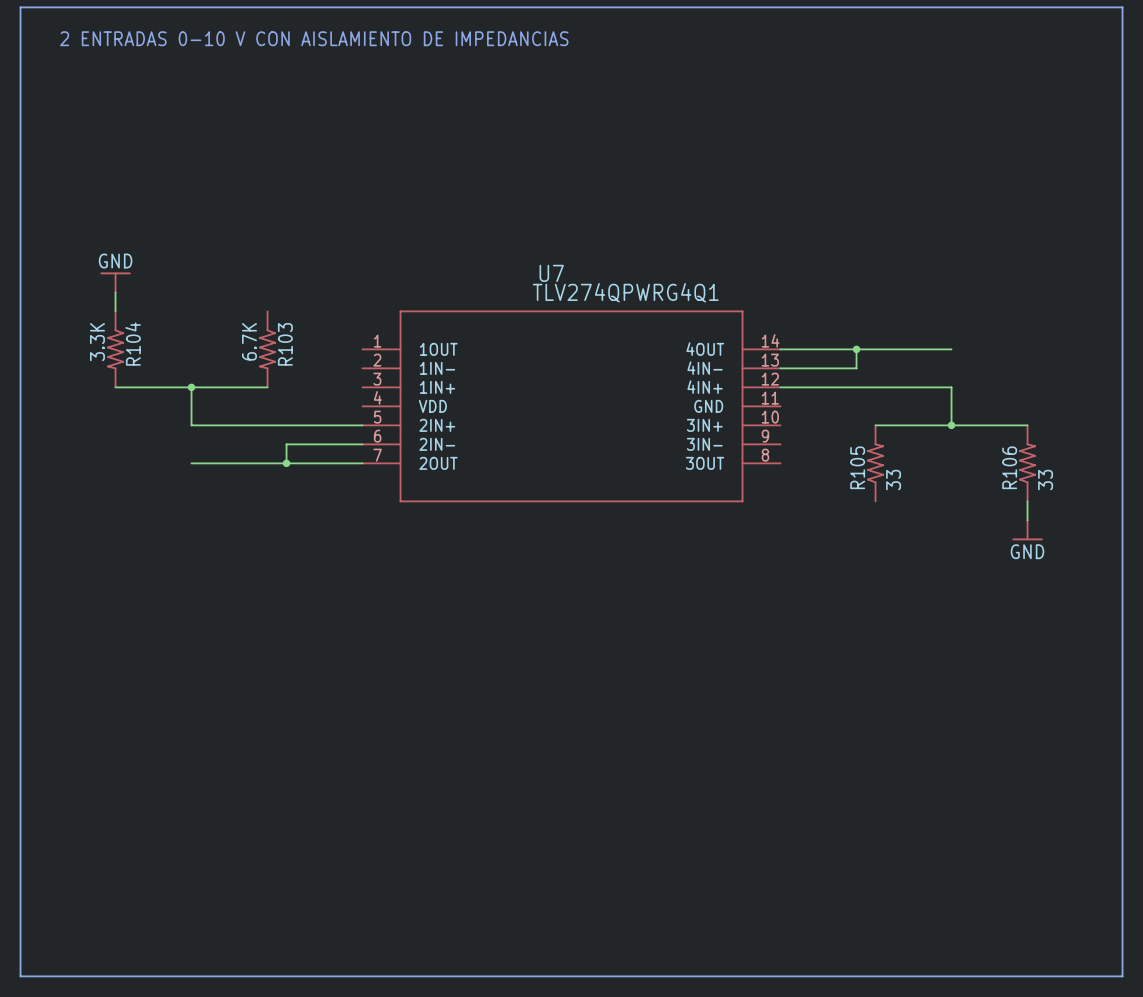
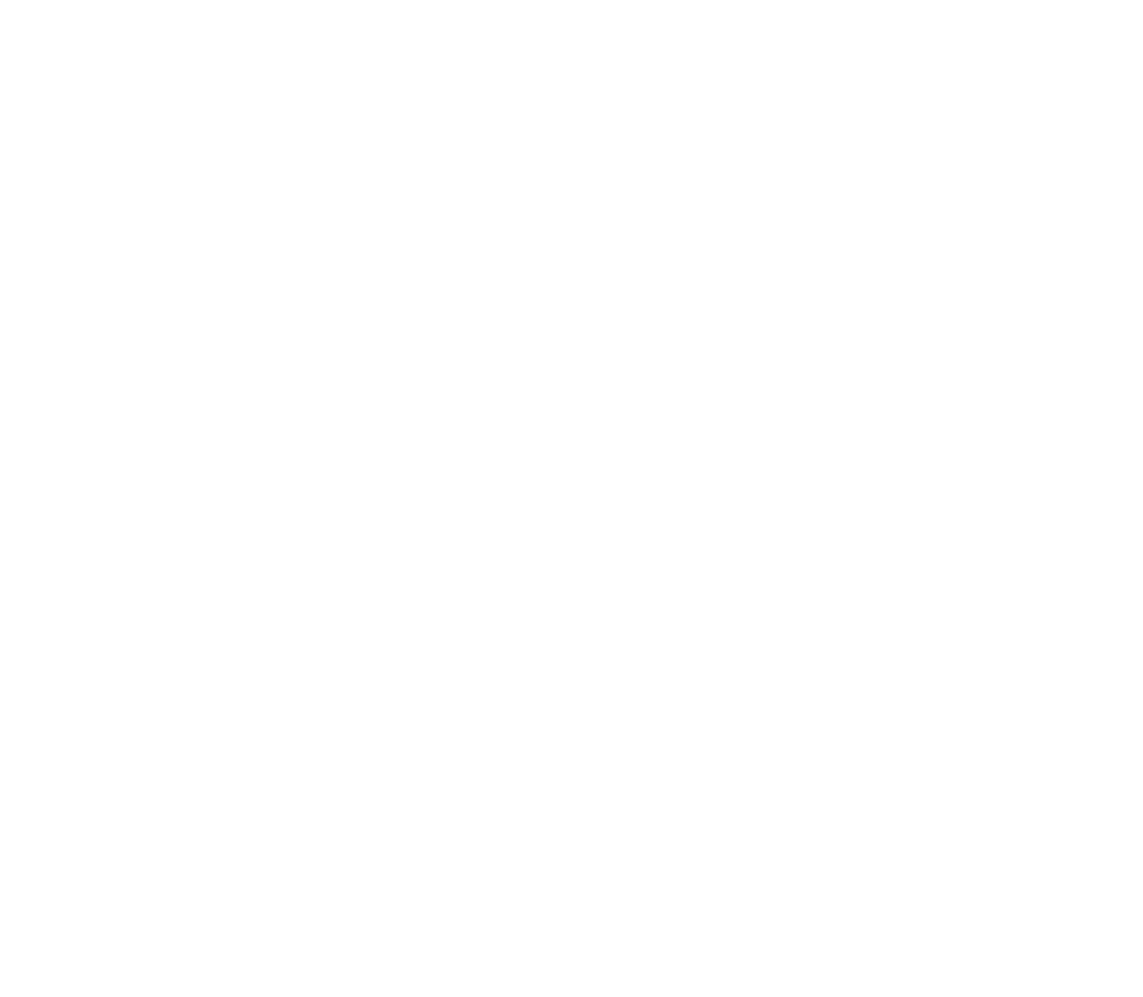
line: (20, 7) (1122, 7) (1122, 976) (20, 976) (20, 7) -> none
text: 2 ENTRADAS 0-10 V CON AISLAMIENTO DE IMPEDANCIAS (314, 38) -> none
power symbol: GND (115, 282) -> none
wire: (115, 292) (115, 311) -> none
R104: 3.3K (115, 349) -> none
R103: 6.7K (267, 349) -> none
wire: (780, 349) (951, 349) -> none
wire: (856, 349) (856, 368) (780, 368) -> none
junction: (856, 349) -> none
wire: (115, 387) (267, 387) -> none
wire: (191, 387) (191, 425) (362, 425) -> none
junction: (191, 387) -> none
wire: (780, 387) (951, 387) (951, 425) -> none
U7: TLV274QPWRG4Q1 (571, 406) -> none
wire: (875, 425) (1027, 425) -> none
junction: (951, 425) -> none
wire: (362, 444) (286, 444) (286, 463) -> none
wire: (191, 463) (362, 463) -> none
junction: (286, 463) -> none
R105: 33 (875, 463) -> none
R106: 33 (1027, 463) -> none
wire: (1027, 501) (1027, 520) -> none
power symbol: GND (1027, 530) -> none

